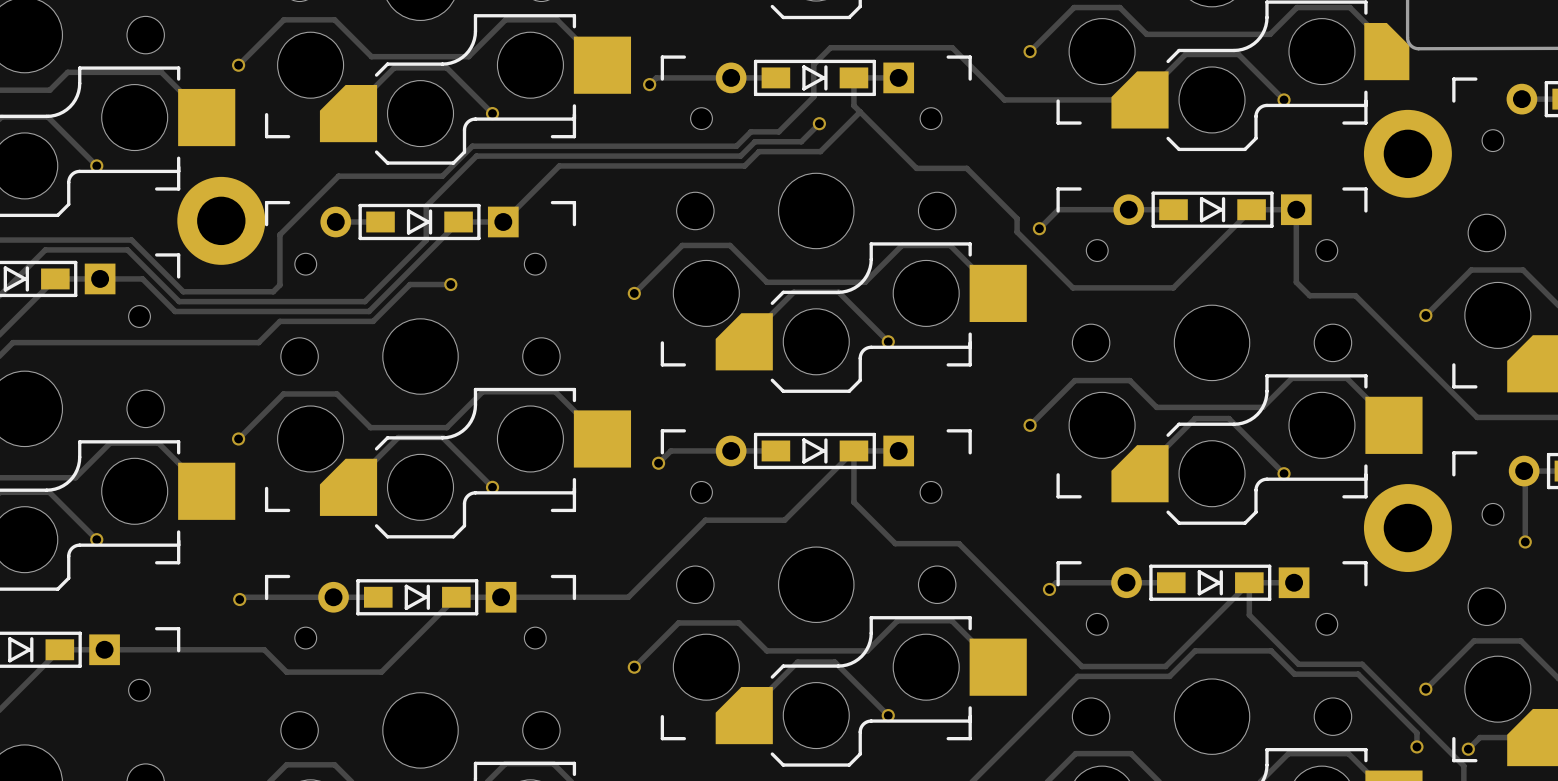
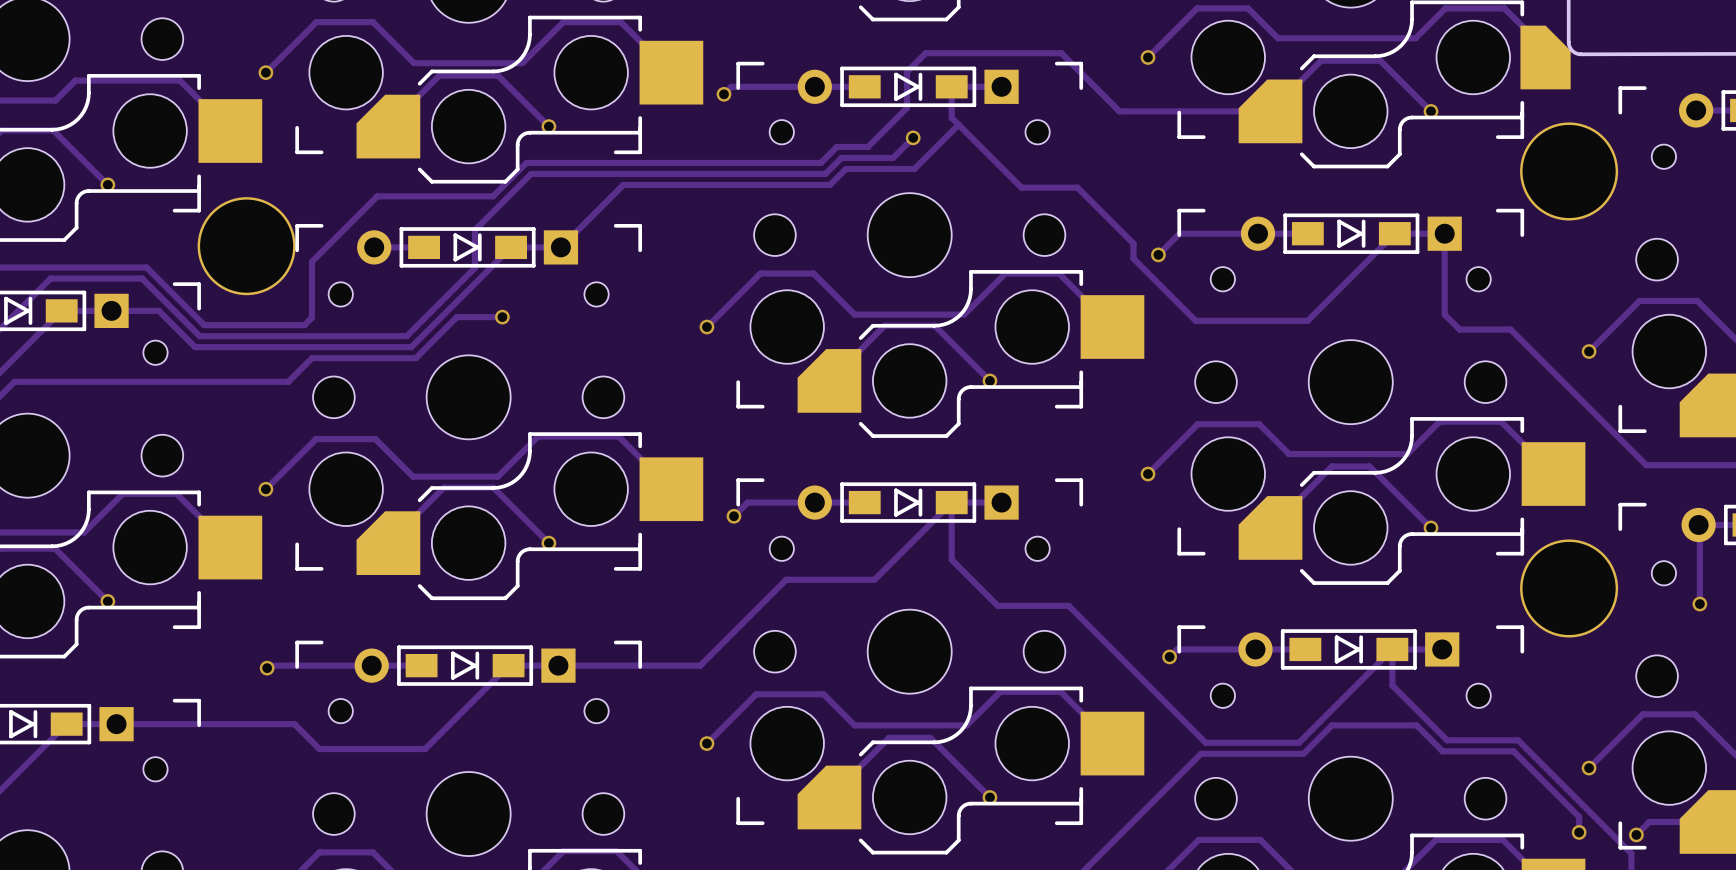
part footprint: [1363, 109, 1452, 198] -> [1520, 122, 1619, 221]
part footprint: [177, 176, 266, 265] -> [197, 197, 296, 296]
part footprint: [1363, 484, 1452, 572] -> [1520, 539, 1619, 638]

